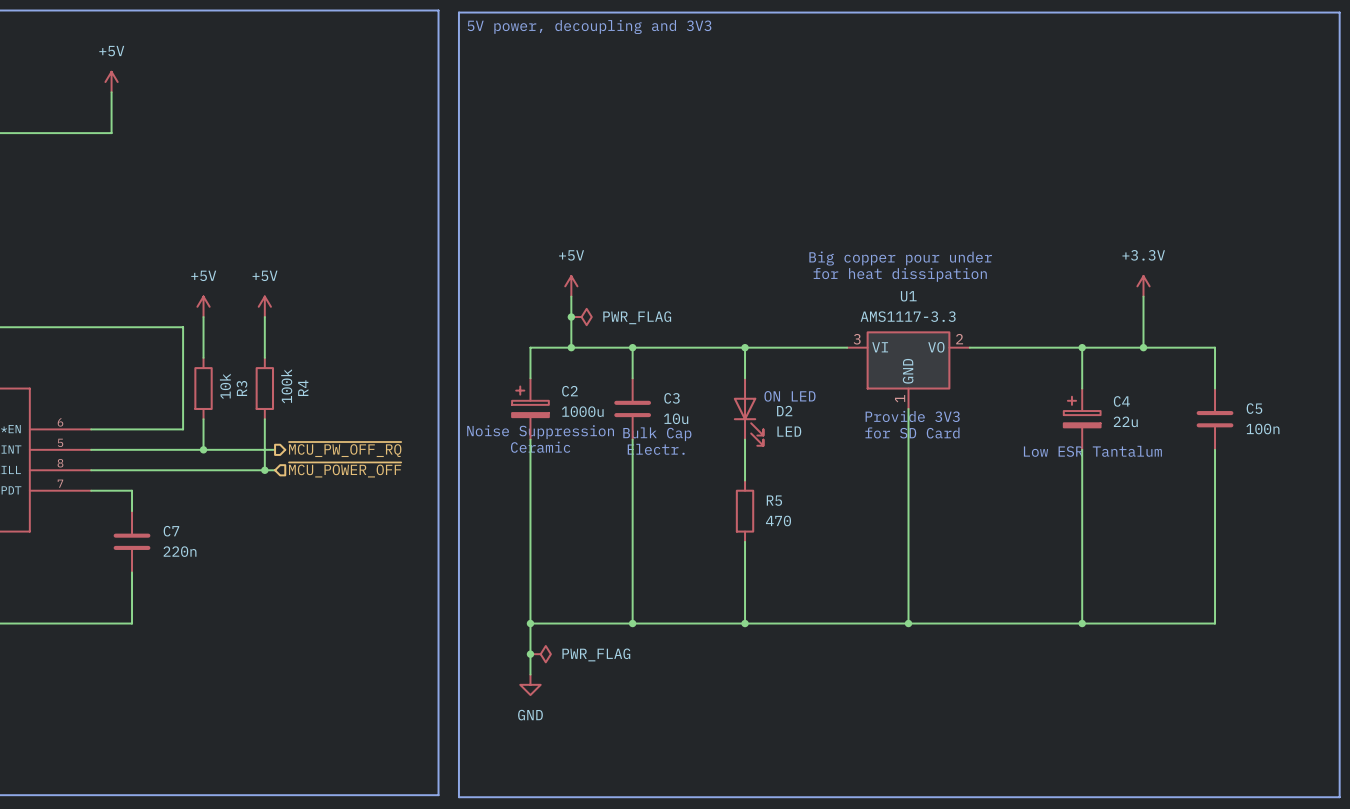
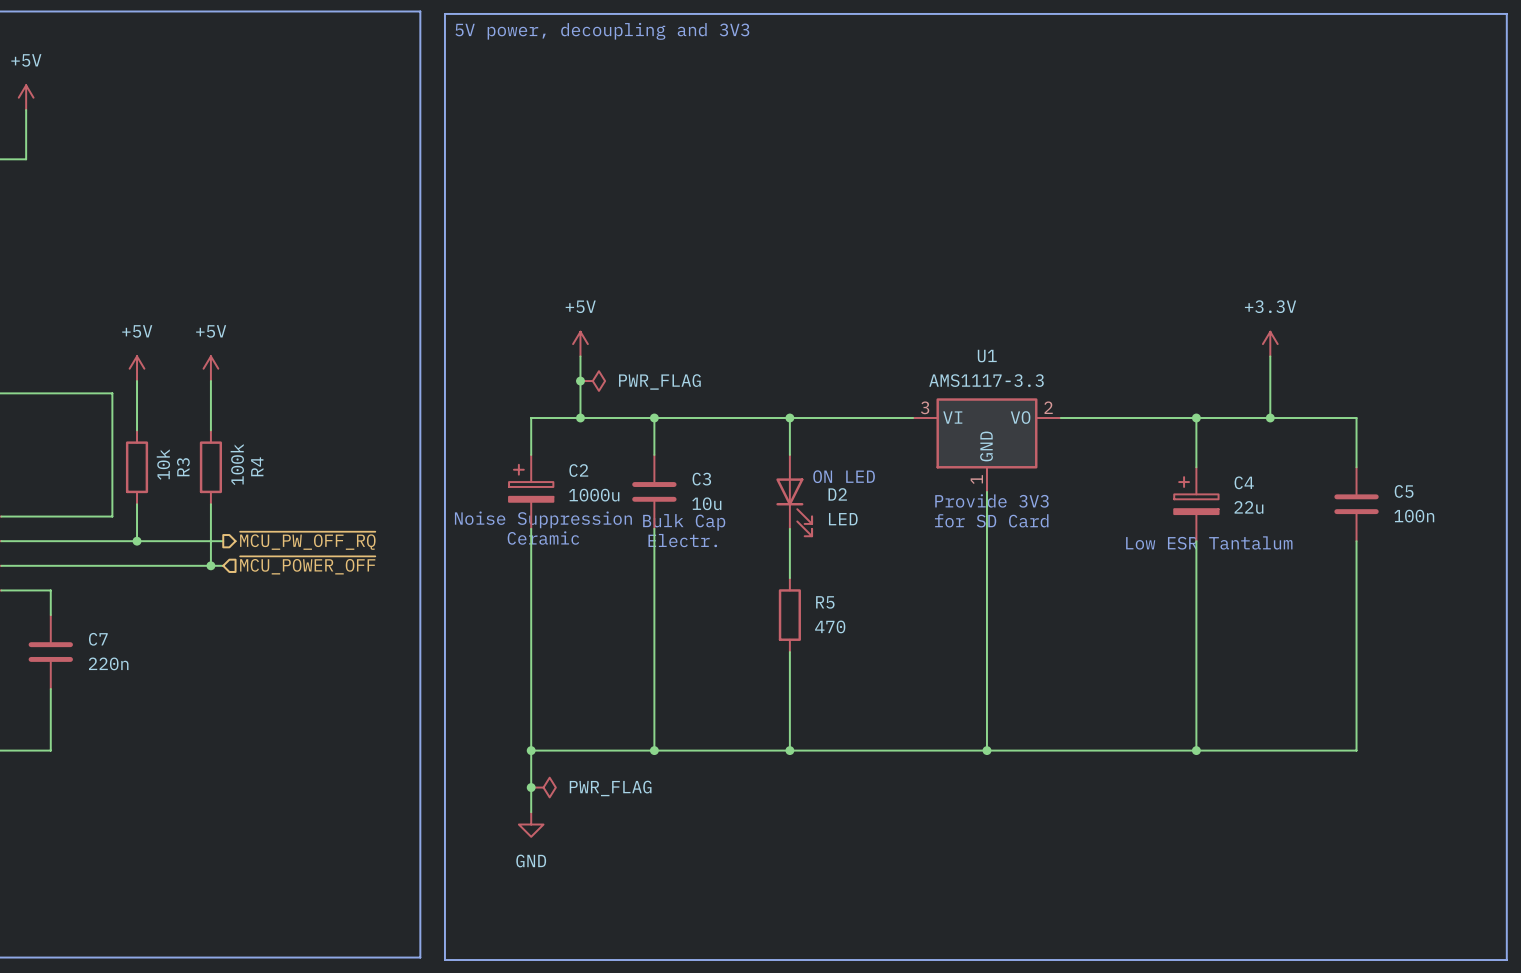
text: Big copper pour under (900, 258) -> none
text: for heat dissipation (900, 274) -> none

